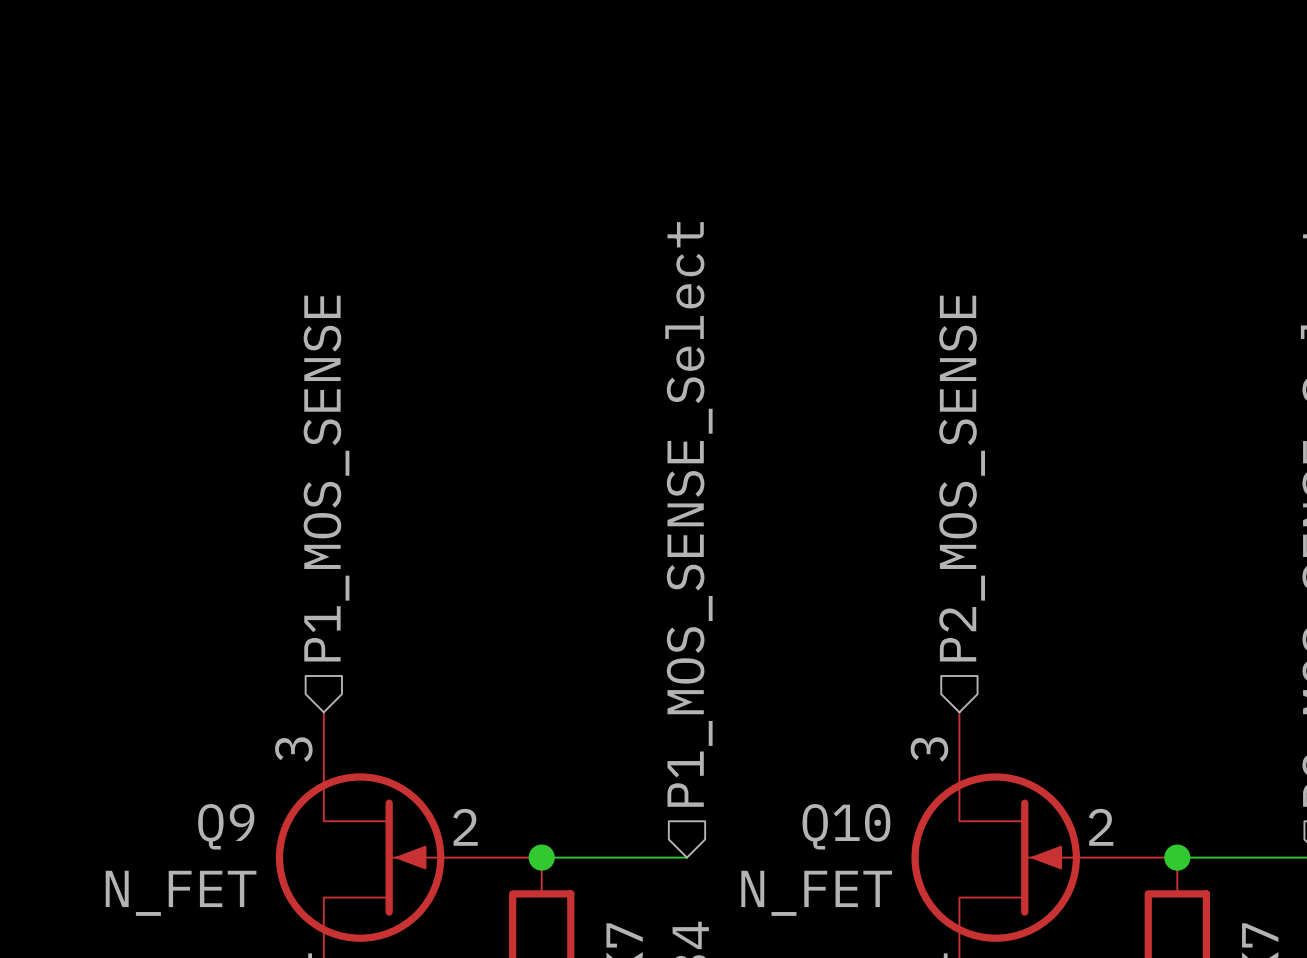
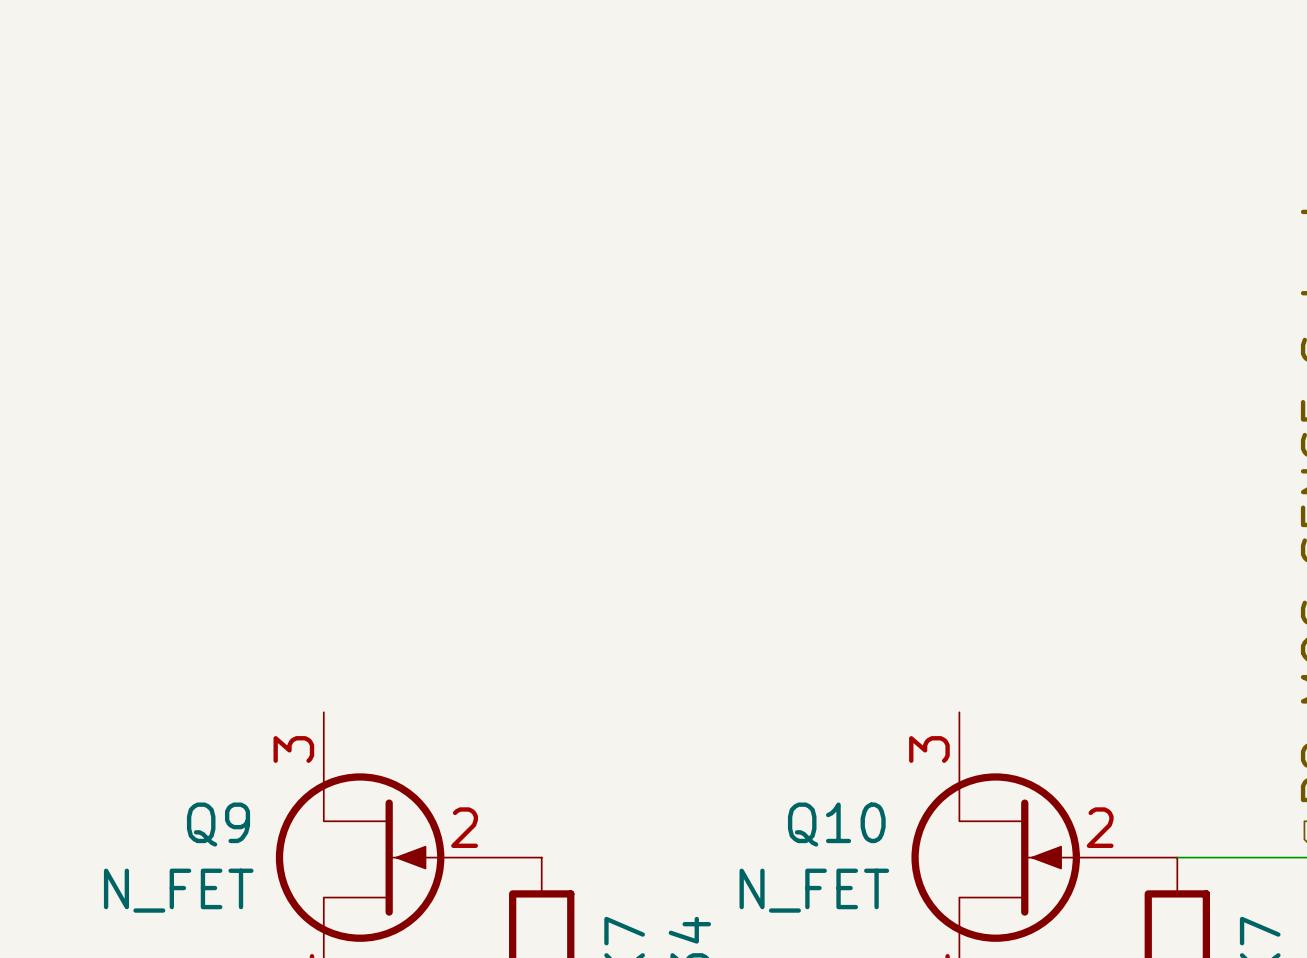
hierarchical label: P1_MOS_SENSE (326, 478) -> none
hierarchical label: P2_MOS_SENSE (962, 478) -> none
hierarchical label: P1_MOS_SENSE_Select (688, 514) -> none
wire: (541, 857) (686, 857) -> none
junction: (541, 857) -> none
junction: (1177, 857) -> none

